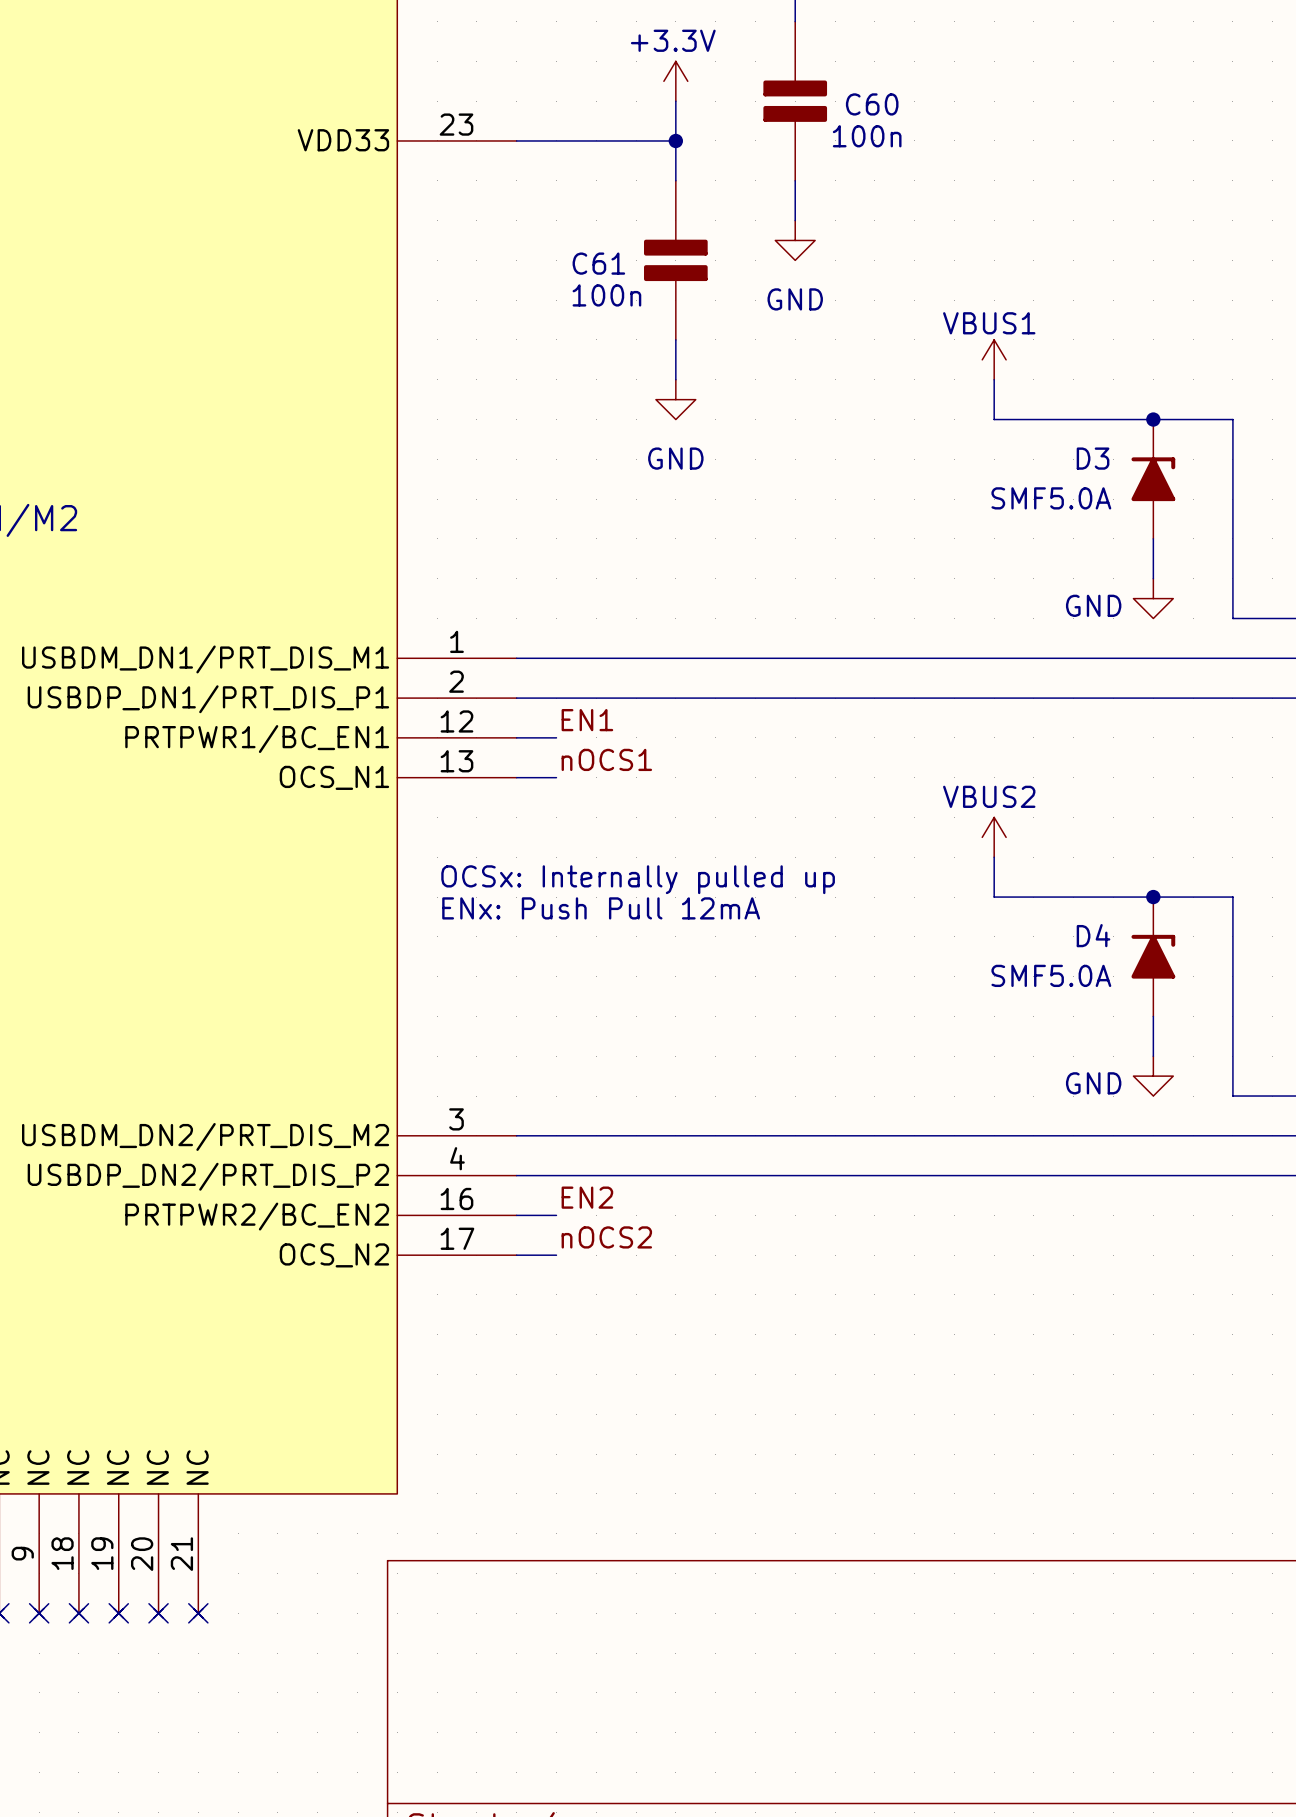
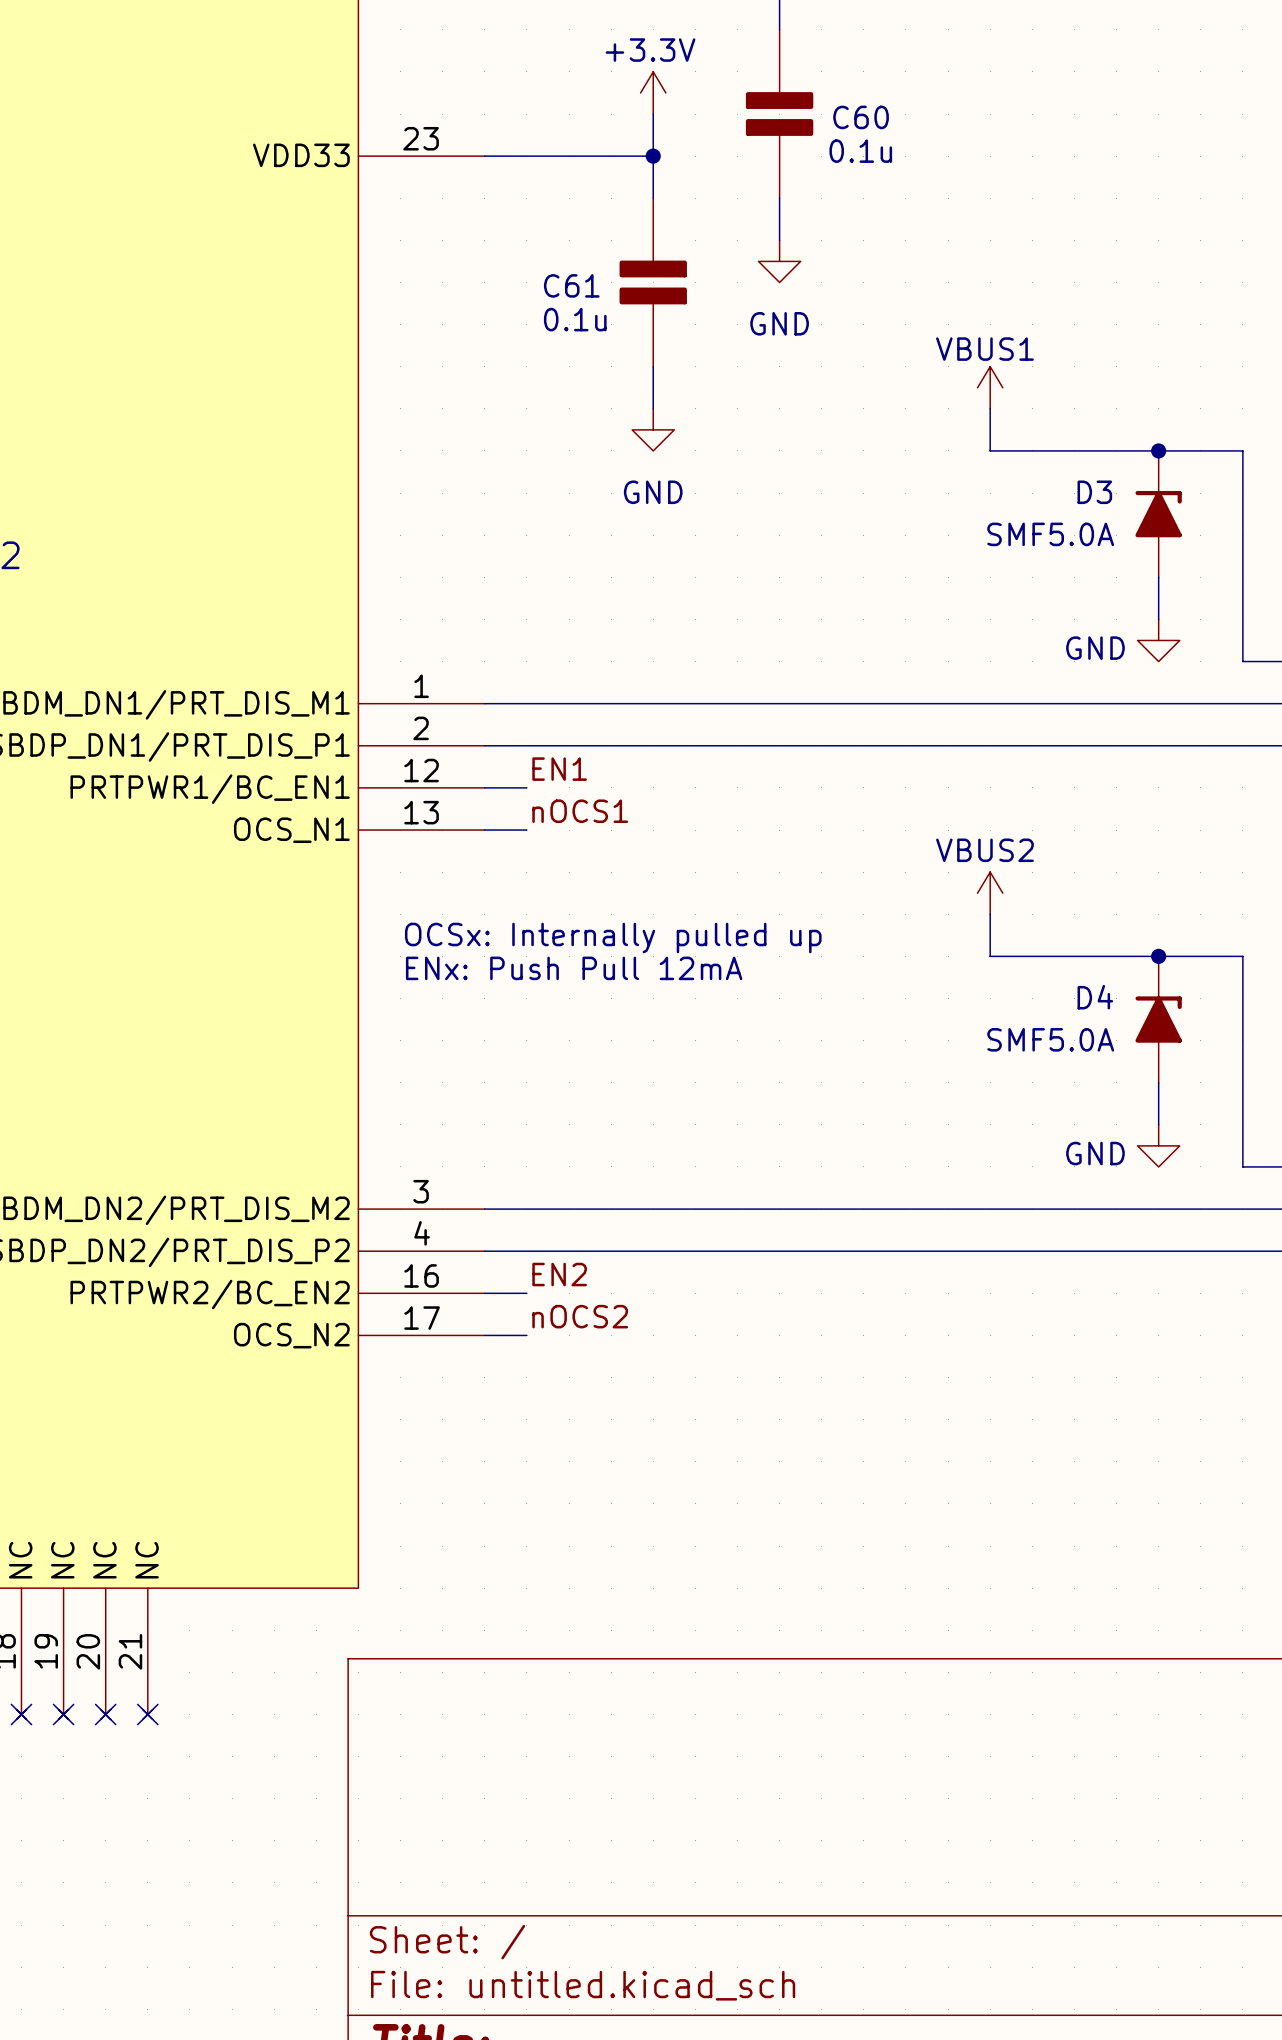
C60 value: 100n (867, 136) -> 0.1u (860, 151)
C61 value: 100n (606, 295) -> 0.1u (575, 319)

